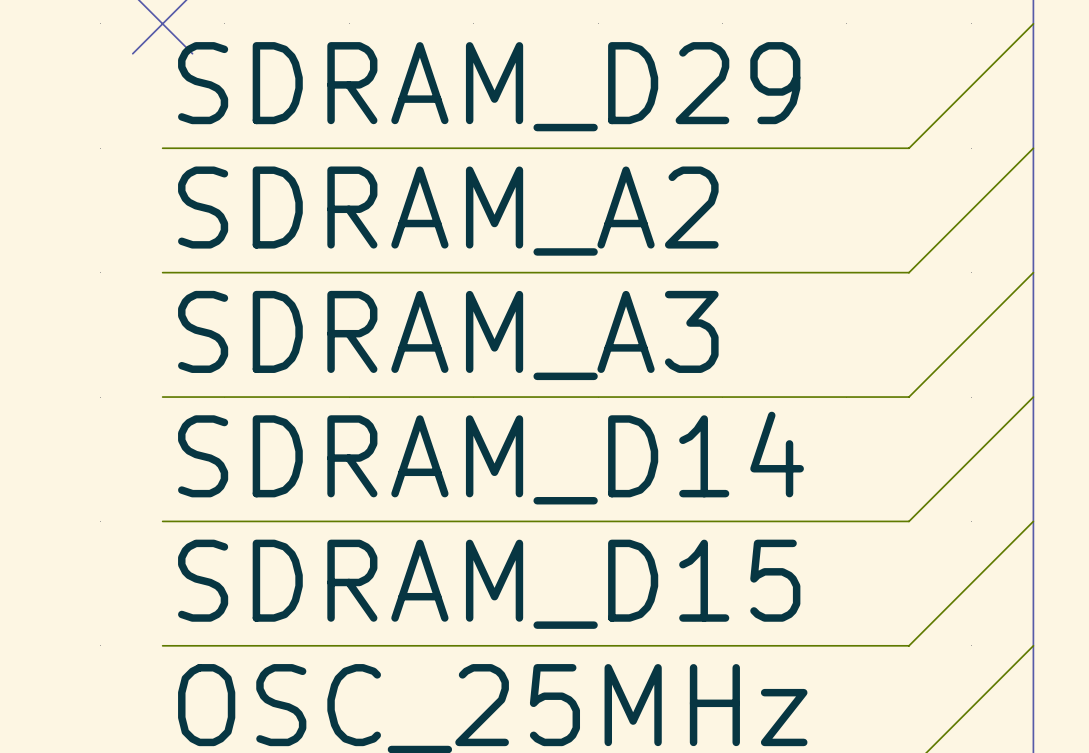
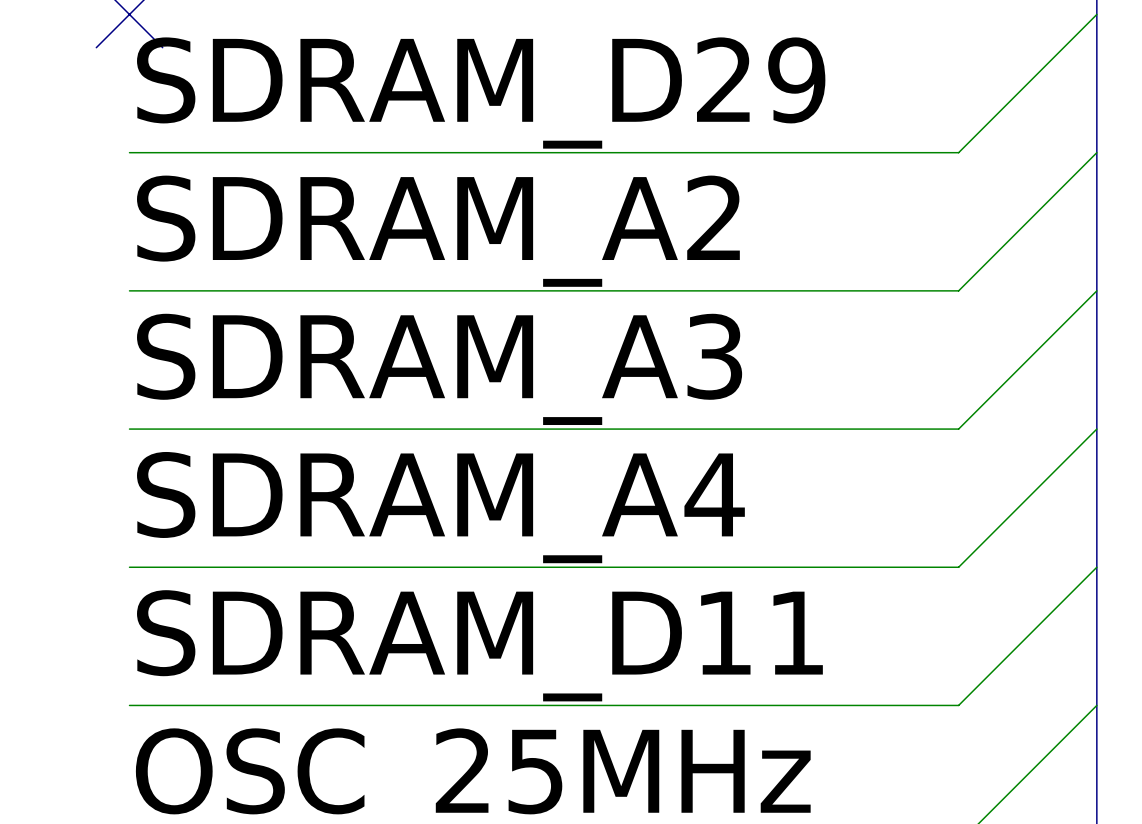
label: SDRAM_D14 (490, 458) -> SDRAM_A4 (440, 507)
label: SDRAM_D15 (489, 584) -> SDRAM_D11 (479, 645)

